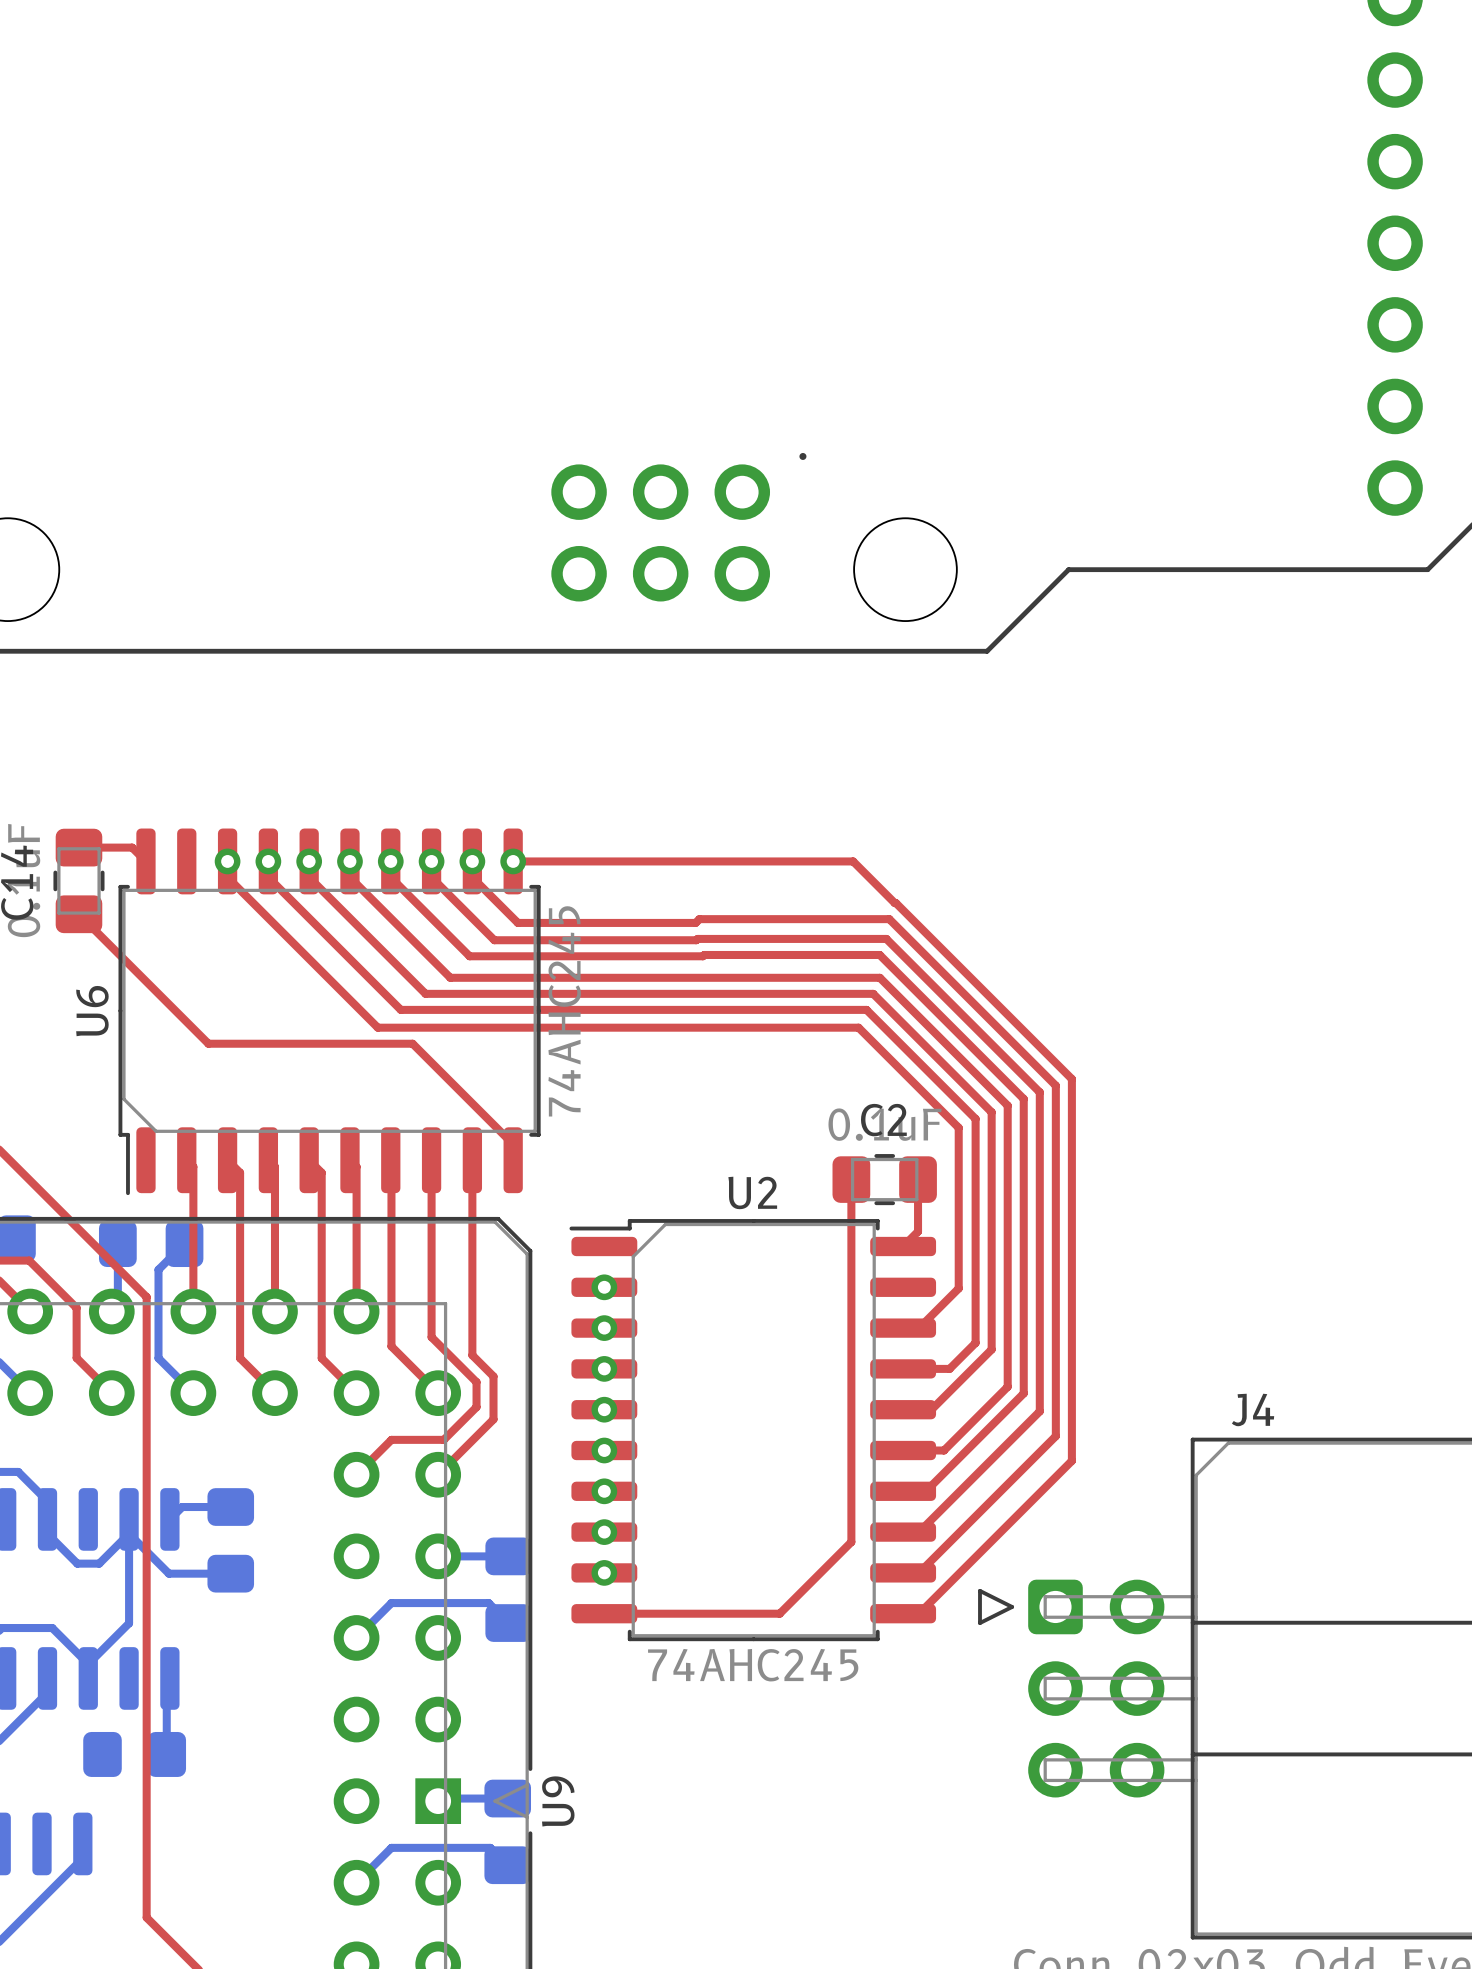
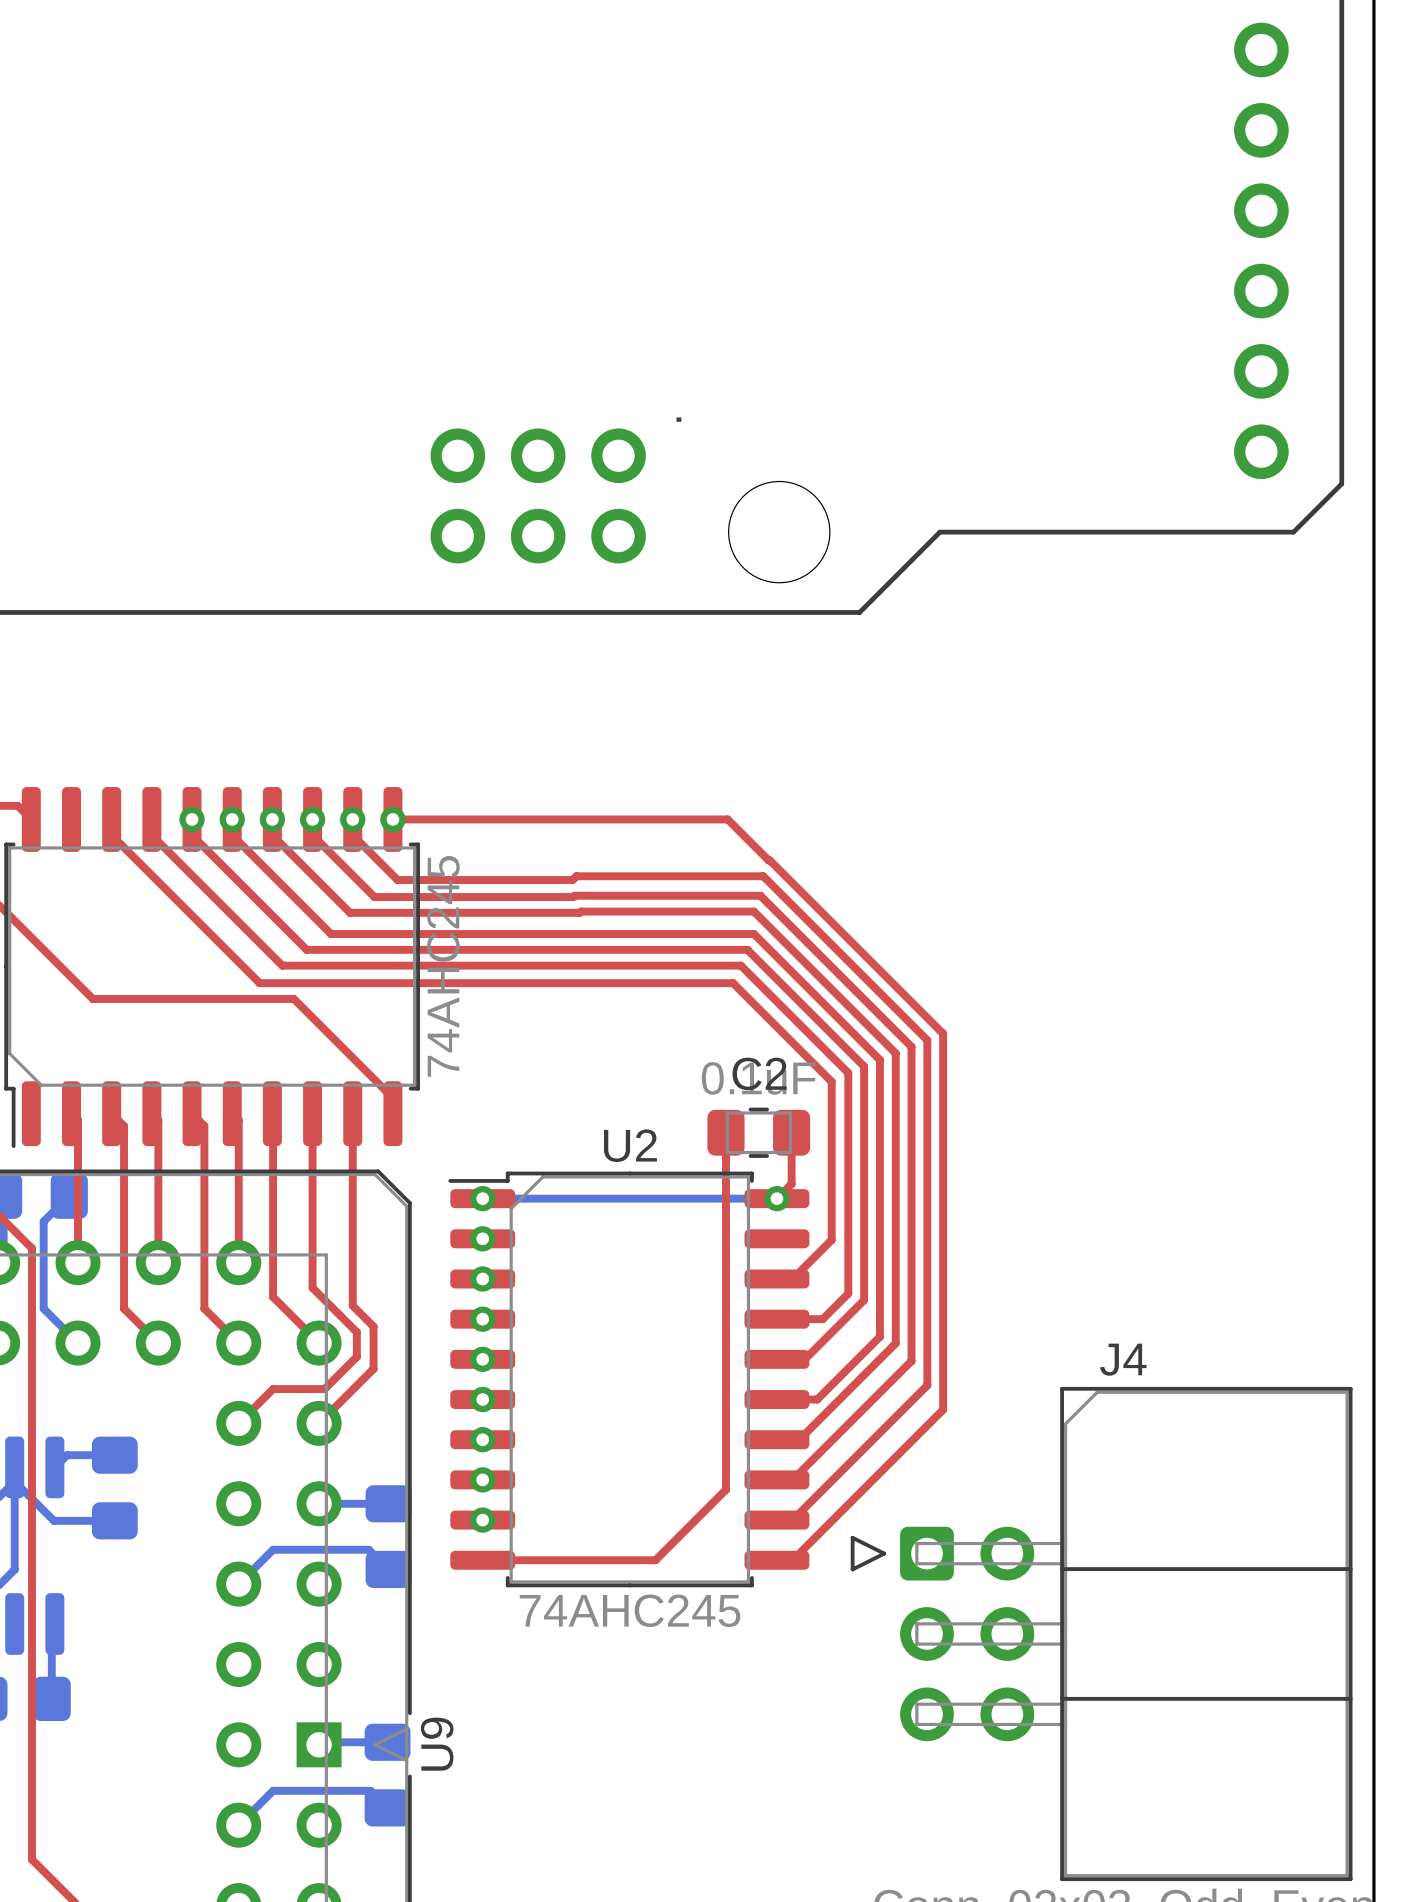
via: (227, 861) -> none
via: (268, 861) -> none
bottom track: none -> (482, 1198) (776, 1198)
via: none -> (482, 1198)
via: none -> (776, 1198)

